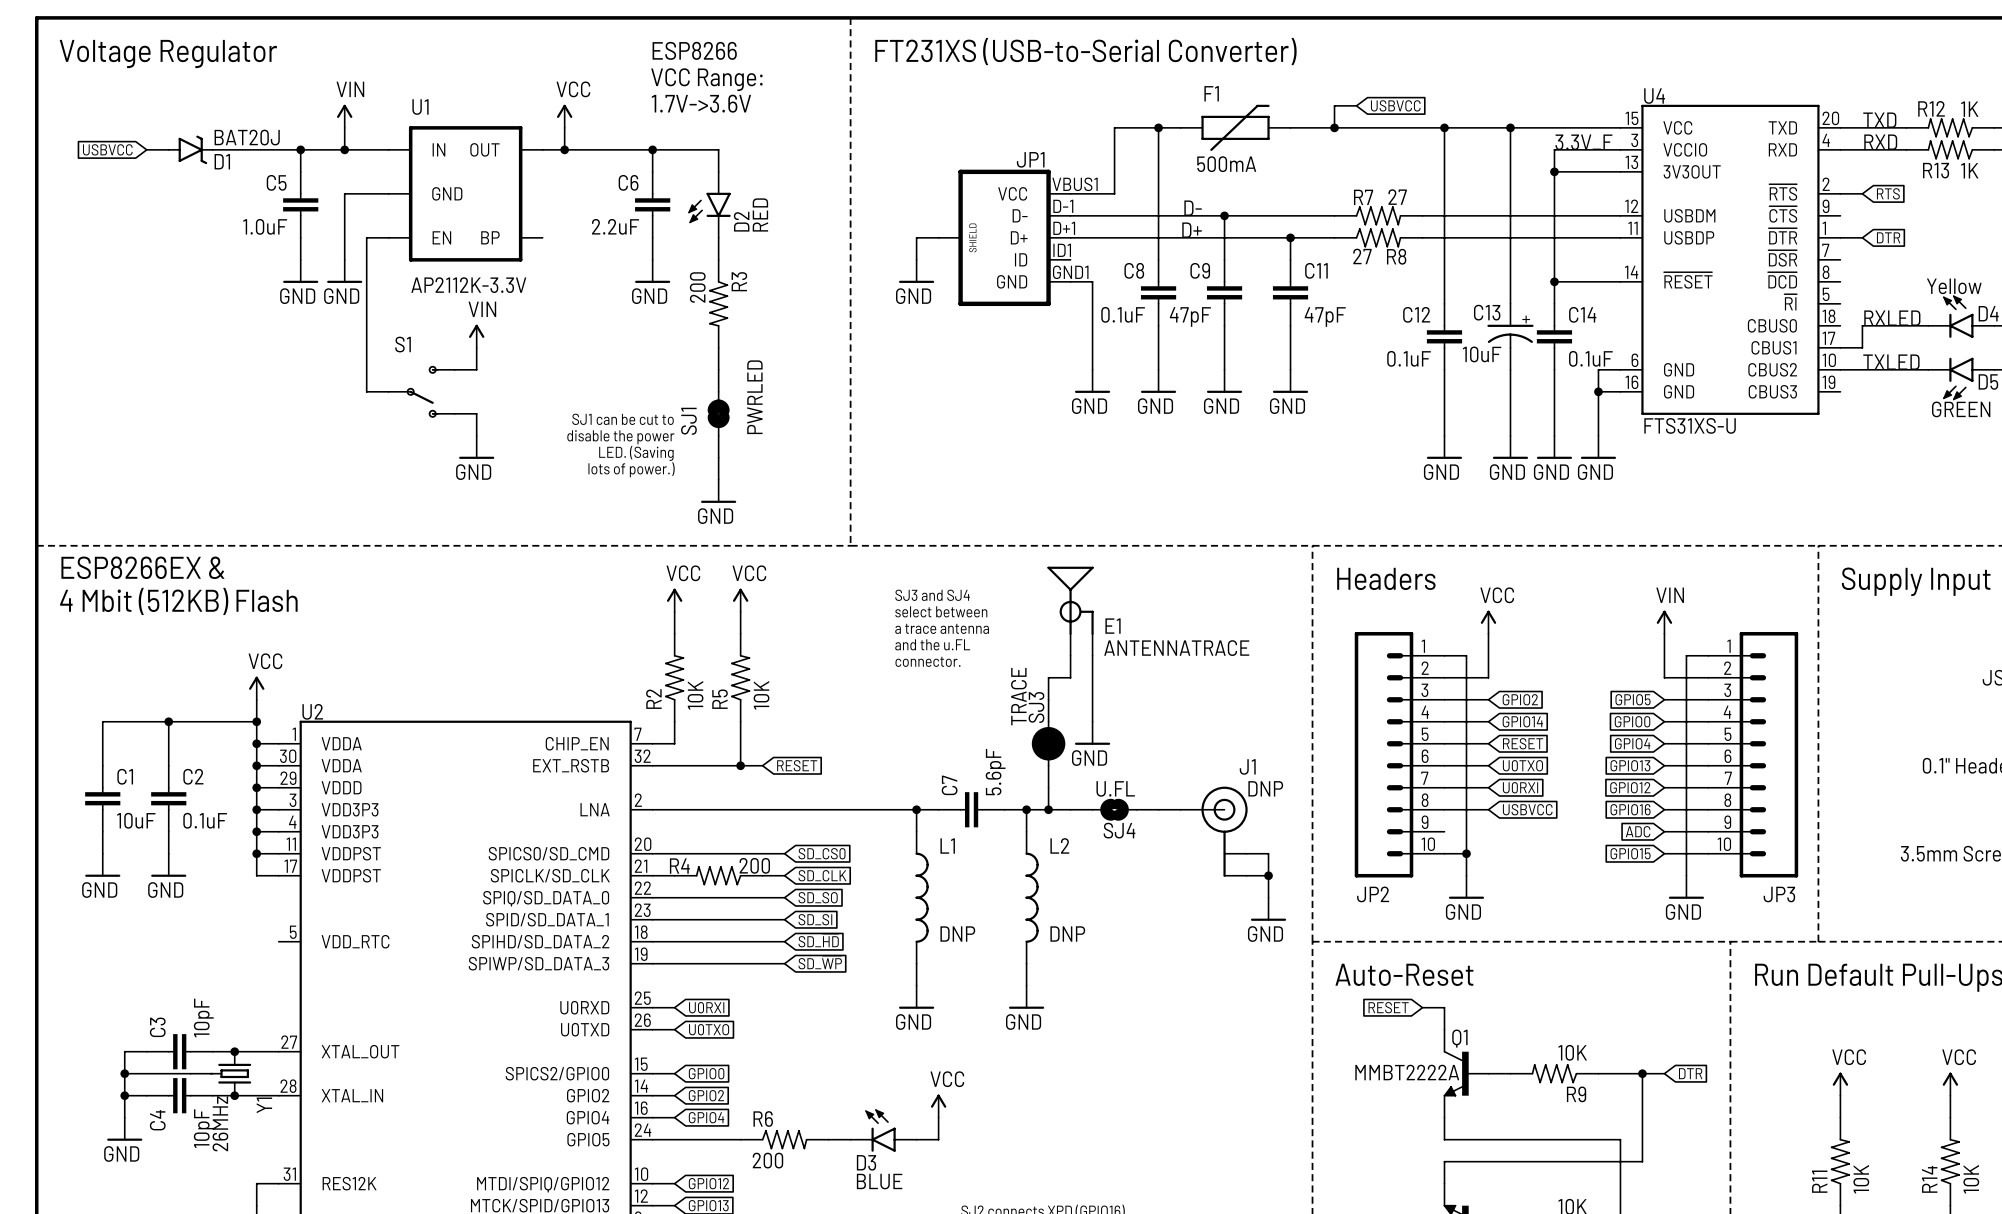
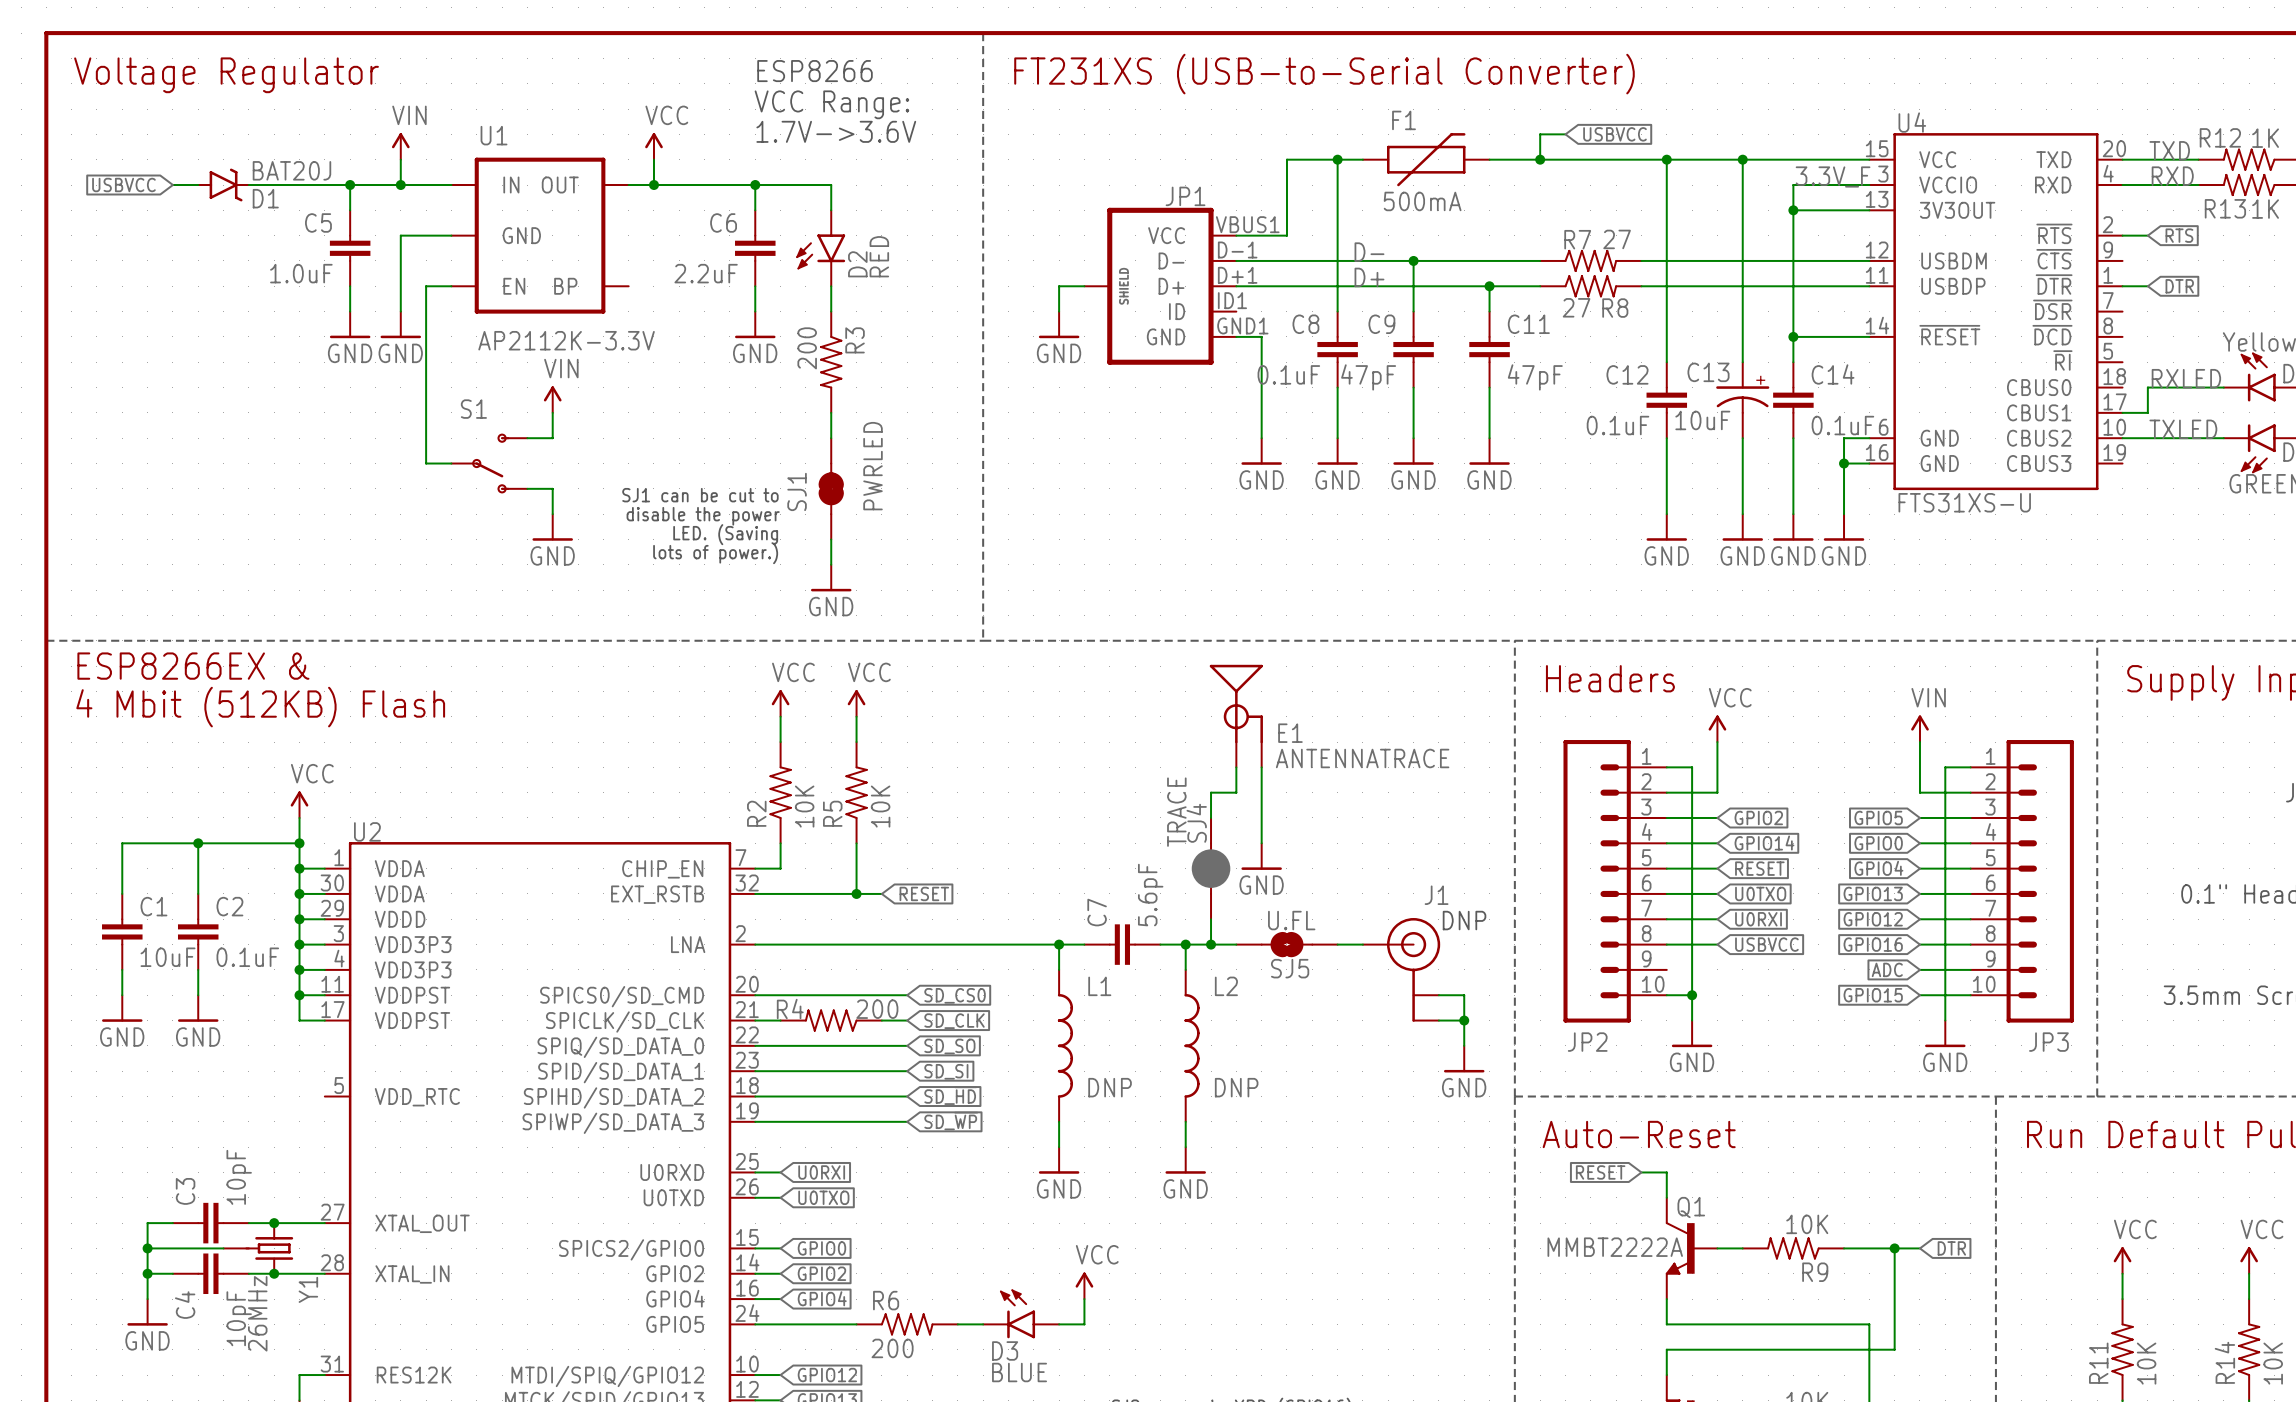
text: SJ3 and SJ4 (932, 595) -> none
text: select between (941, 611) -> none
text: a trace antenna (942, 628) -> none
text: and the u.FL (932, 644) -> none
text: connector. (928, 661) -> none
SJ3 name: SJ3 (1036, 707) -> SJ4 (1196, 823)
SJ4 name: SJ4 (1119, 830) -> SJ5 (1290, 968)

